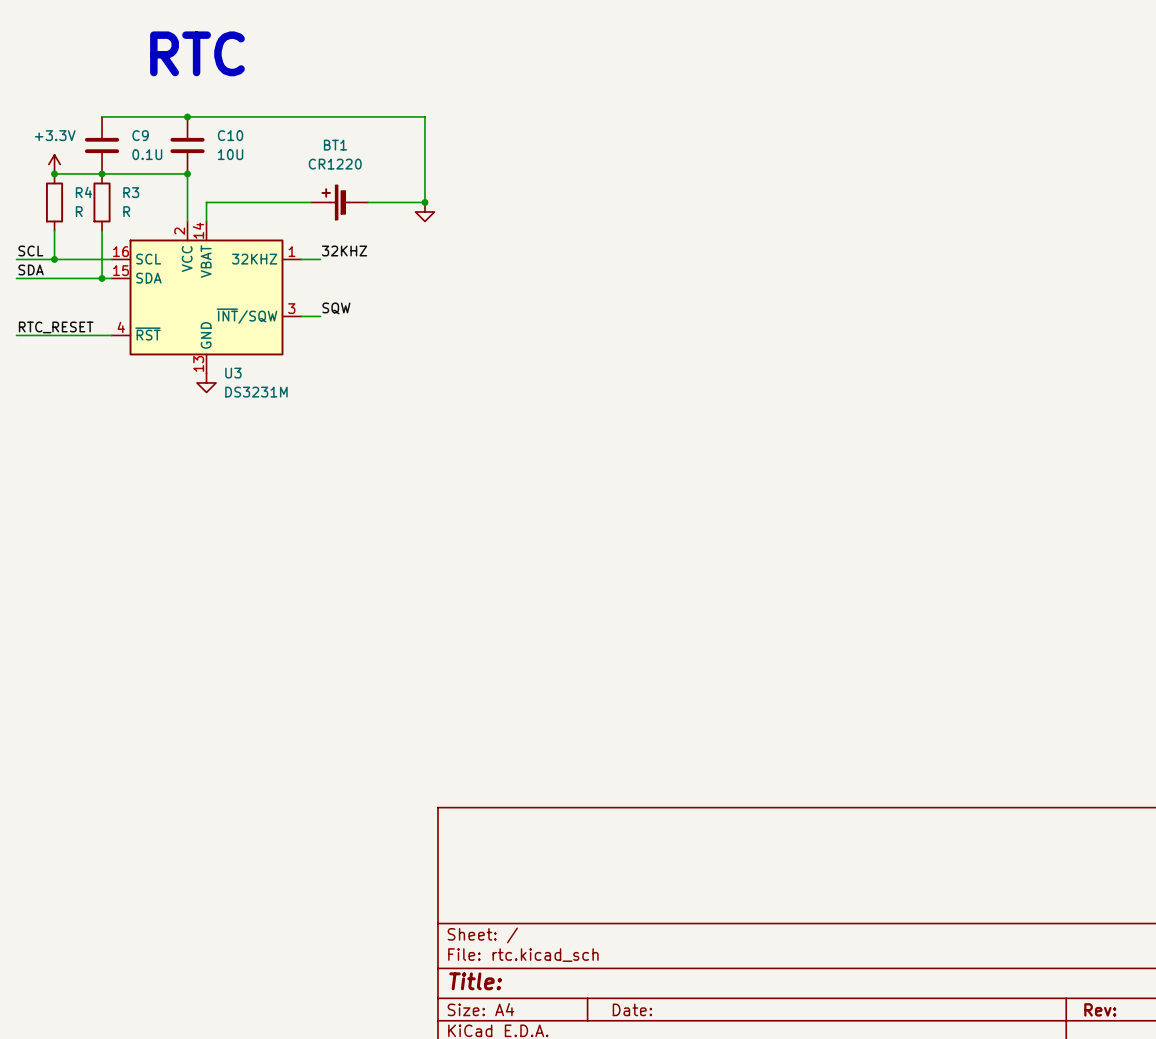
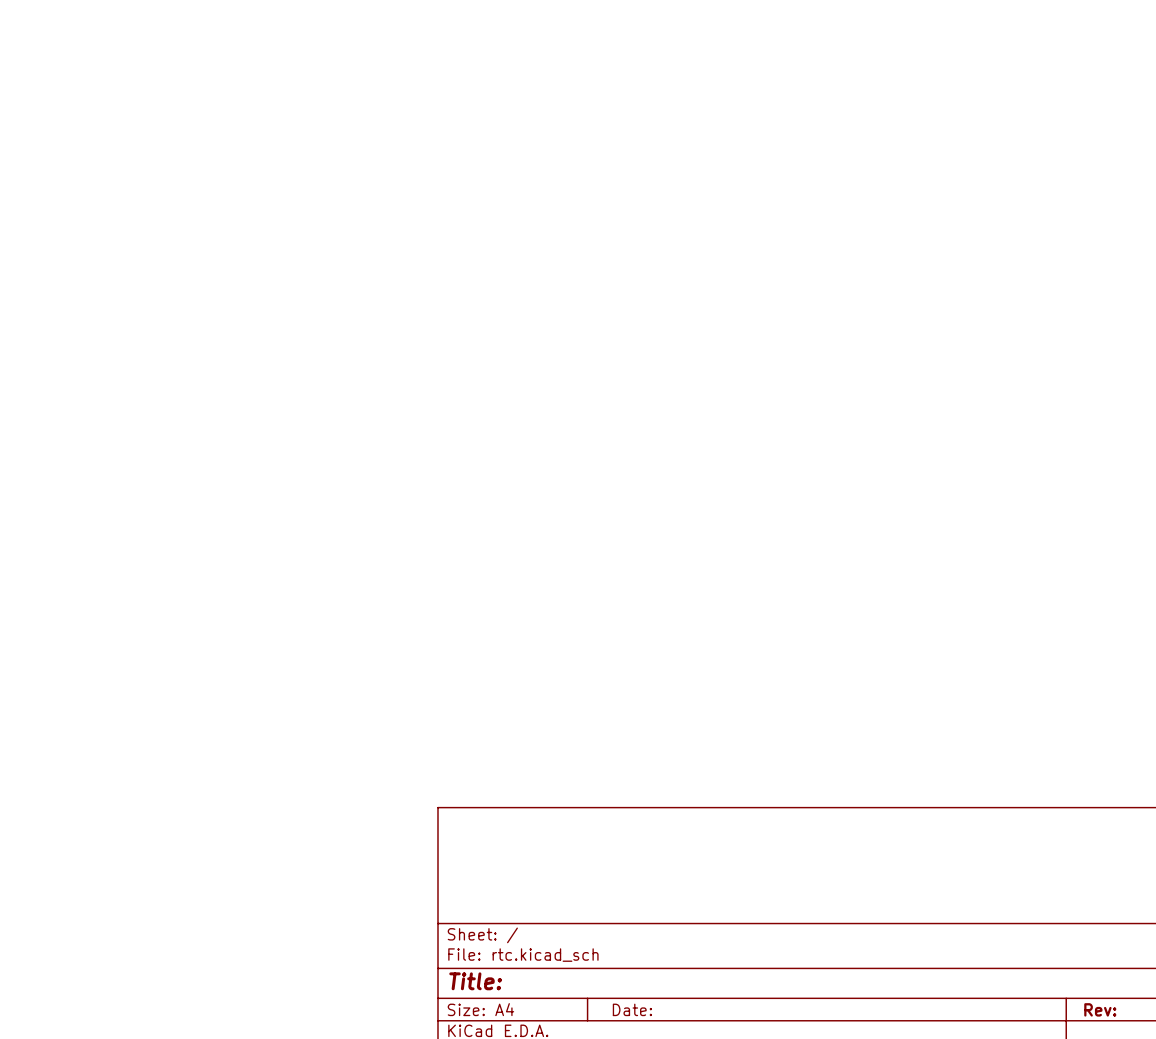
text: RTC (197, 53) -> none
wire: (102, 116) (424, 116) (424, 202) (367, 202) -> none
junction: (187, 116) -> none
C9: 0.1U (102, 145) -> none
C10: 10U (187, 145) -> none
power symbol: +3.3V (54, 164) -> none
wire: (54, 173) (187, 173) (187, 221) -> none
junction: (54, 173) -> none
junction: (102, 173) -> none
junction: (187, 173) -> none
R4: R (54, 202) -> none
R3: R (102, 202) -> none
wire: (310, 202) (206, 202) (206, 221) -> none
BT1: CR1220 (339, 202) -> none
junction: (424, 202) -> none
power symbol: (424, 211) -> none
wire: (54, 230) (54, 259) -> none
wire: (102, 230) (102, 278) -> none
label: SCL (30, 250) -> none
label: 32KHZ (344, 250) -> none
wire: (16, 259) (111, 259) -> none
junction: (54, 259) -> none
wire: (301, 259) (320, 259) -> none
label: SDA (31, 269) -> none
wire: (16, 278) (111, 278) -> none
junction: (102, 278) -> none
U3: DS3231M (206, 297) -> none
label: SQW (336, 308) -> none
wire: (301, 316) (320, 316) -> none
label: RTC_RESET (56, 327) -> none
wire: (16, 335) (111, 335) -> none
power symbol: (206, 382) -> none

